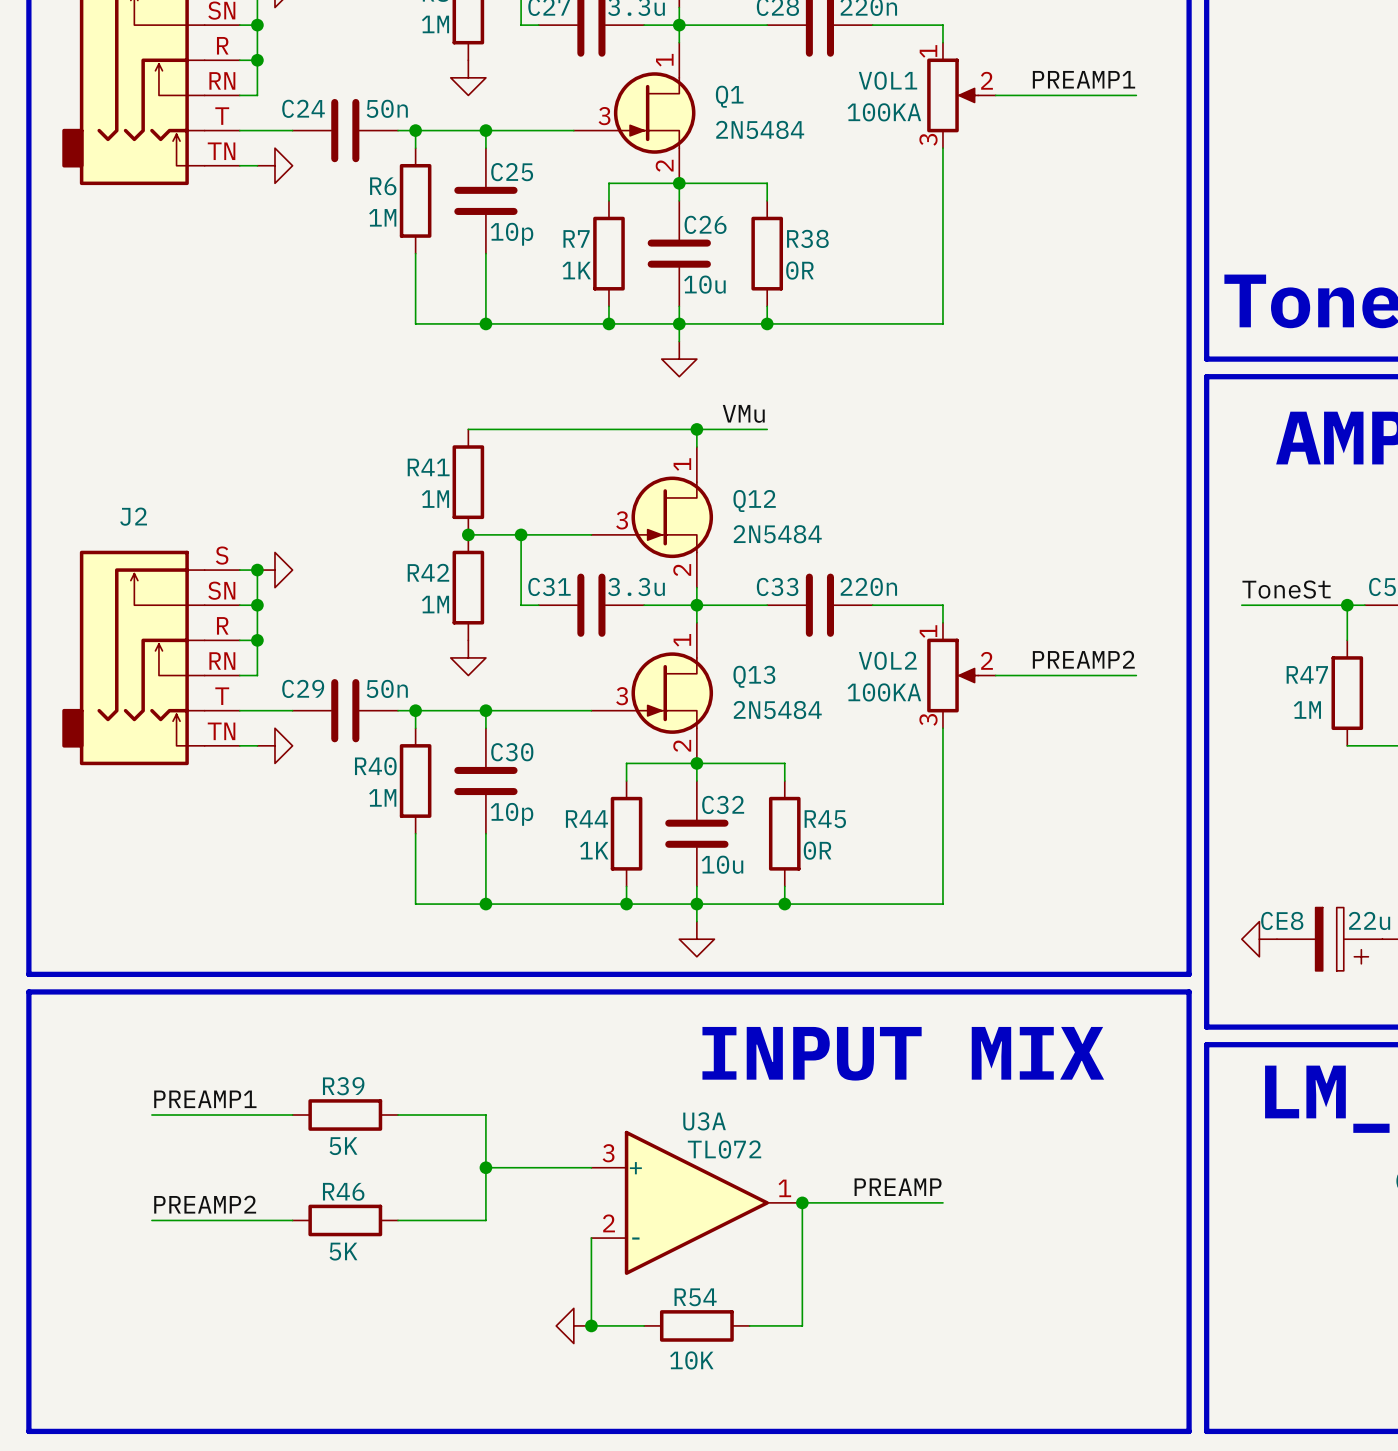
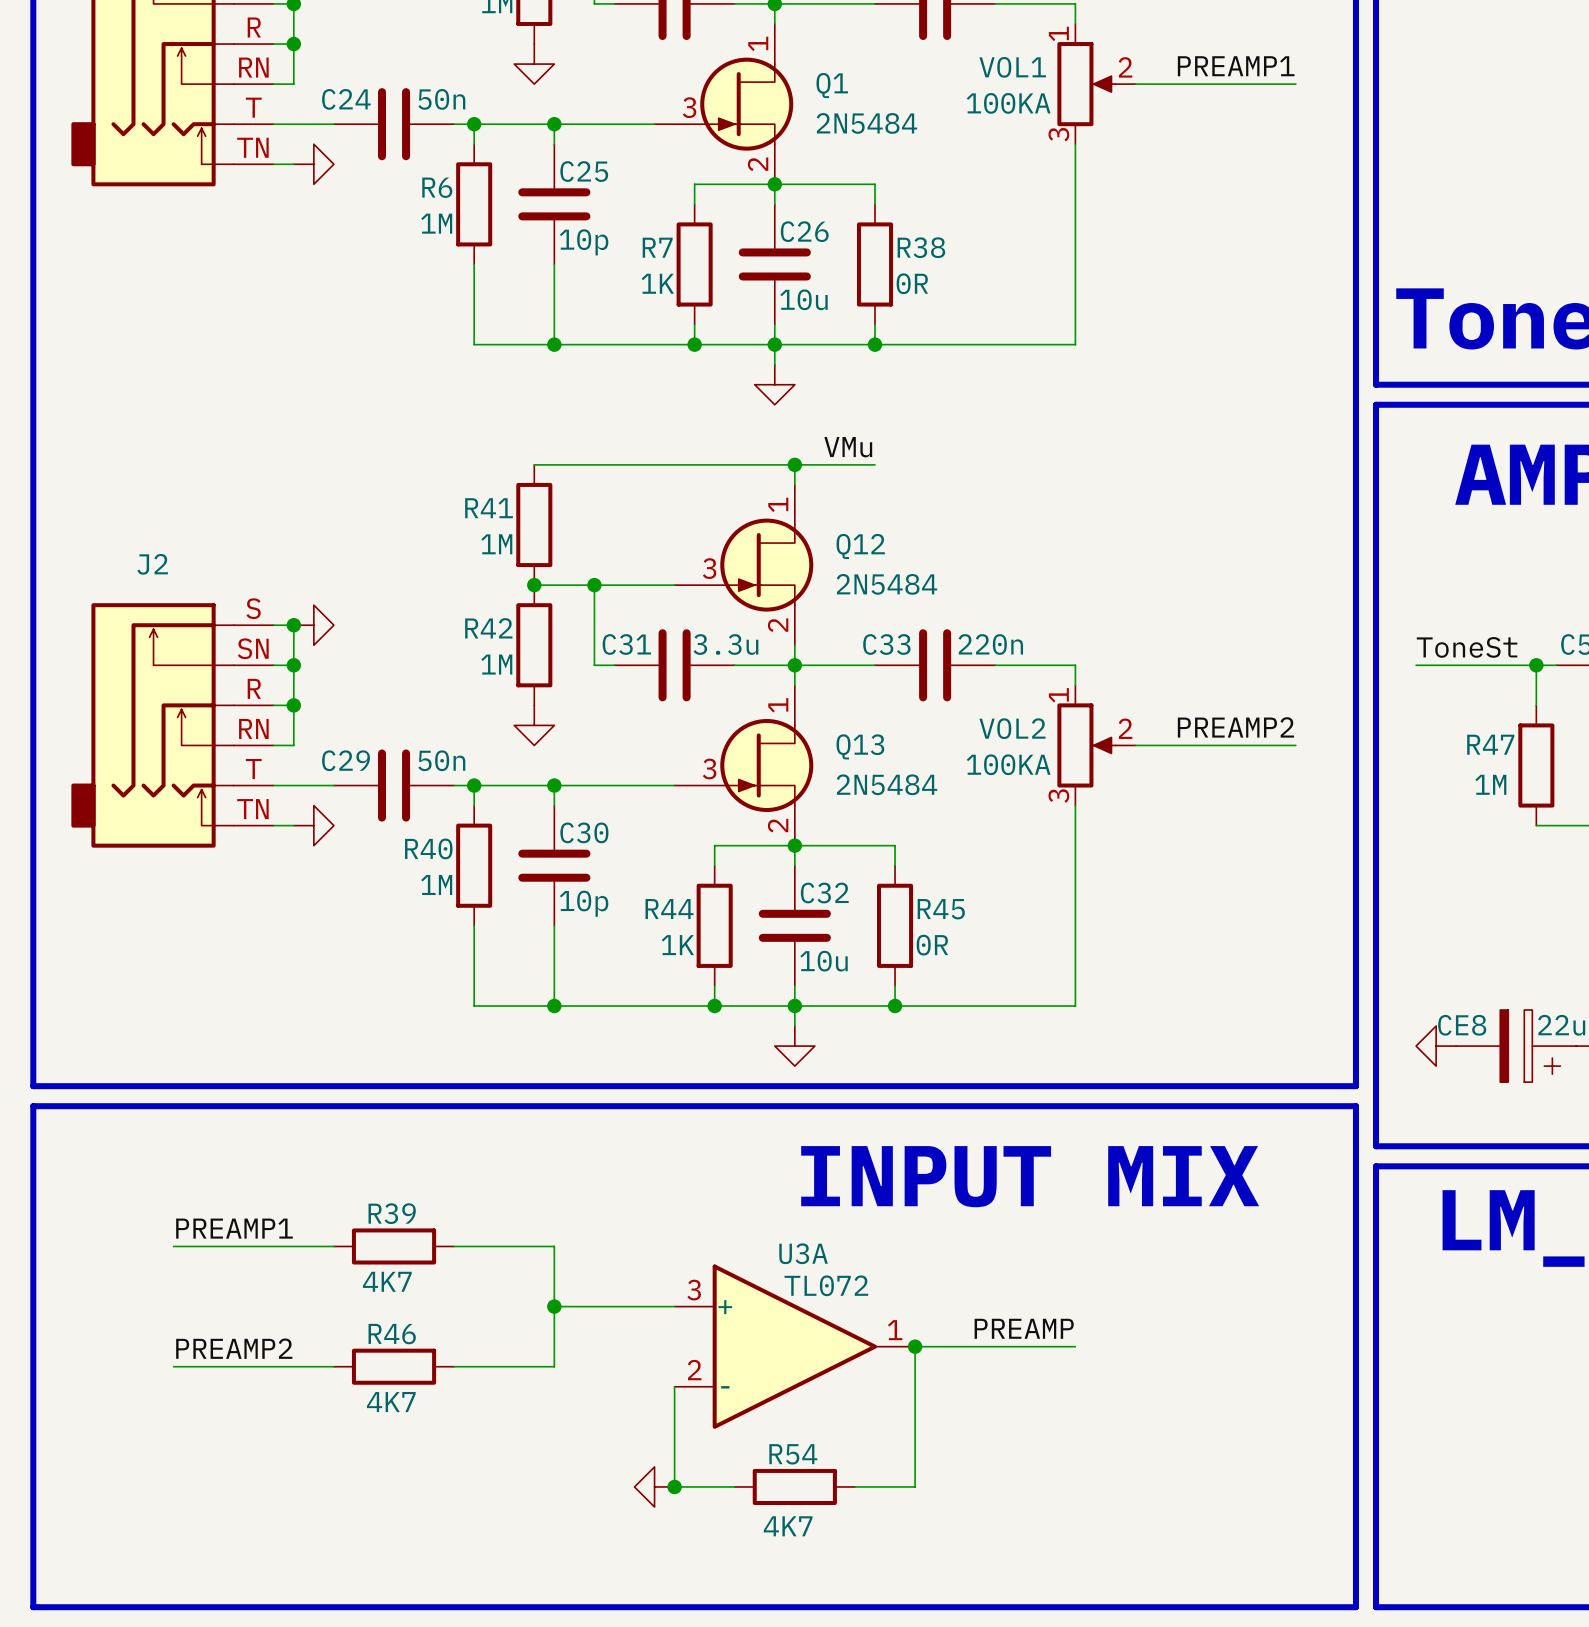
R39 value: 5K (343, 1146) -> 4K7 (387, 1281)
R46 value: 5K (343, 1251) -> 4K7 (391, 1402)
R54 value: 10K (691, 1360) -> 4K7 (788, 1526)

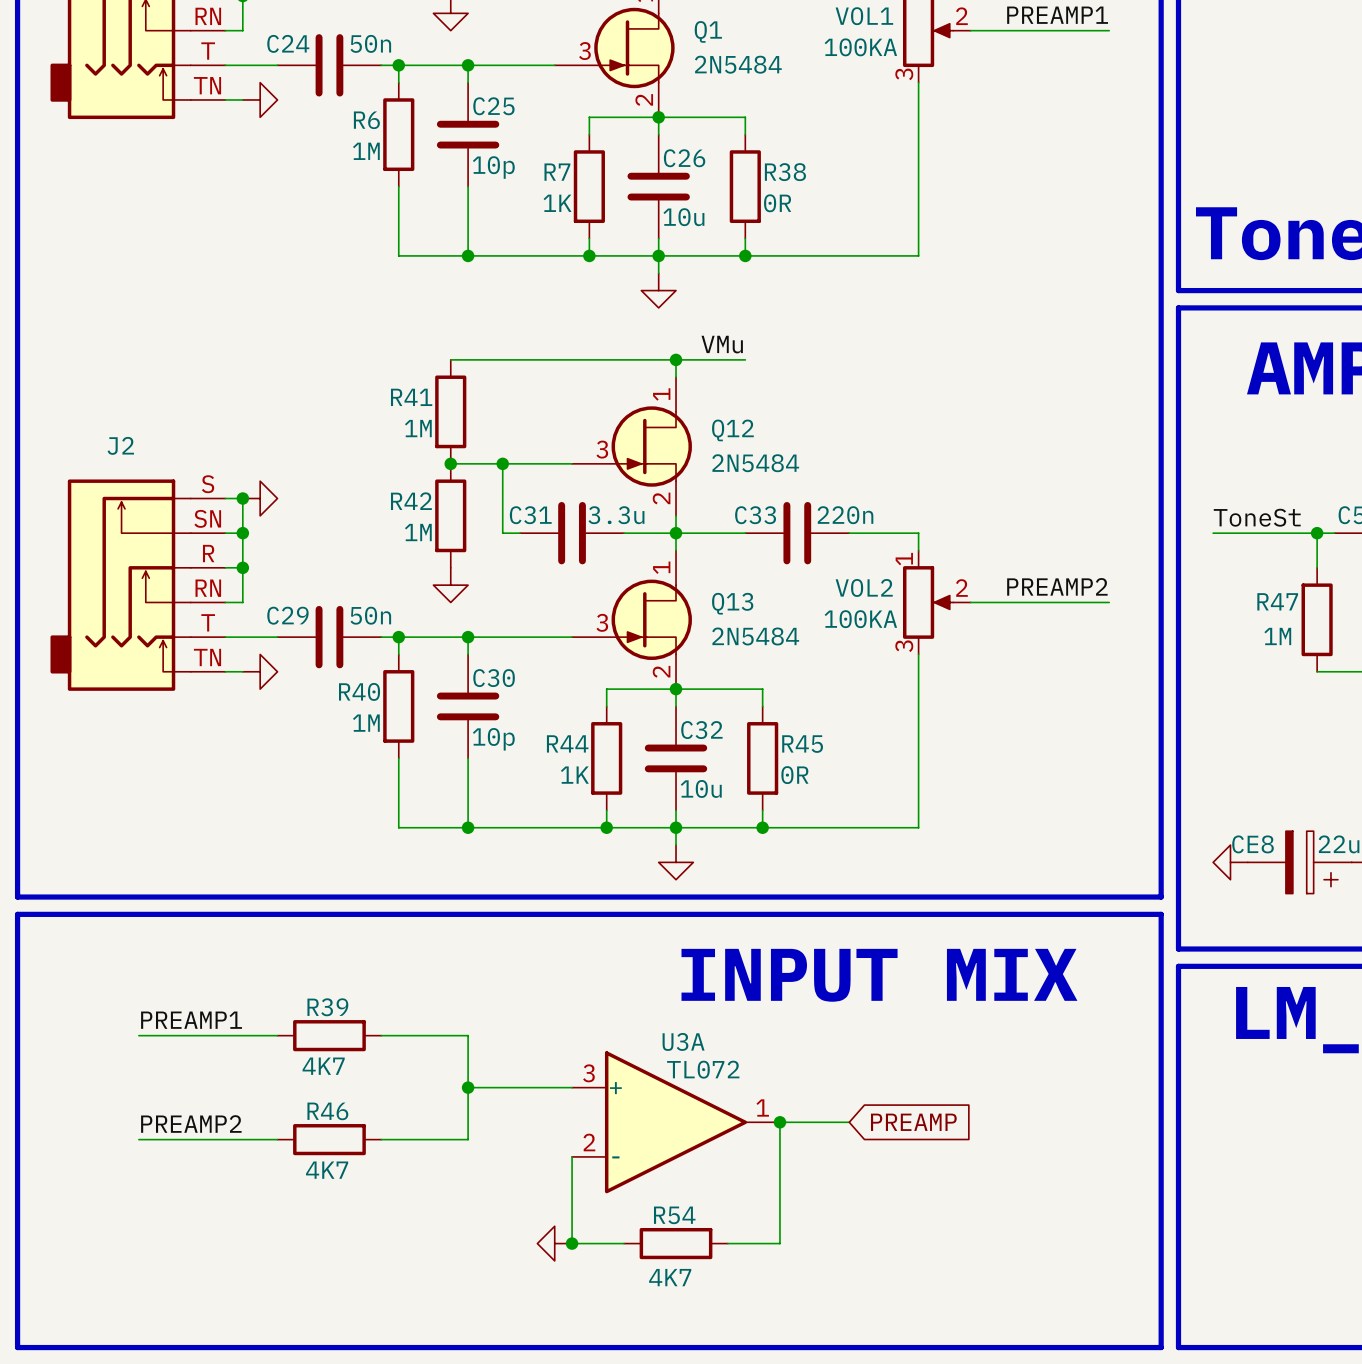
label: PREAMP (1024, 1328) -> none
wire: (995, 1346) (1075, 1346) -> none
global label: none -> PREAMP (913, 1122)

